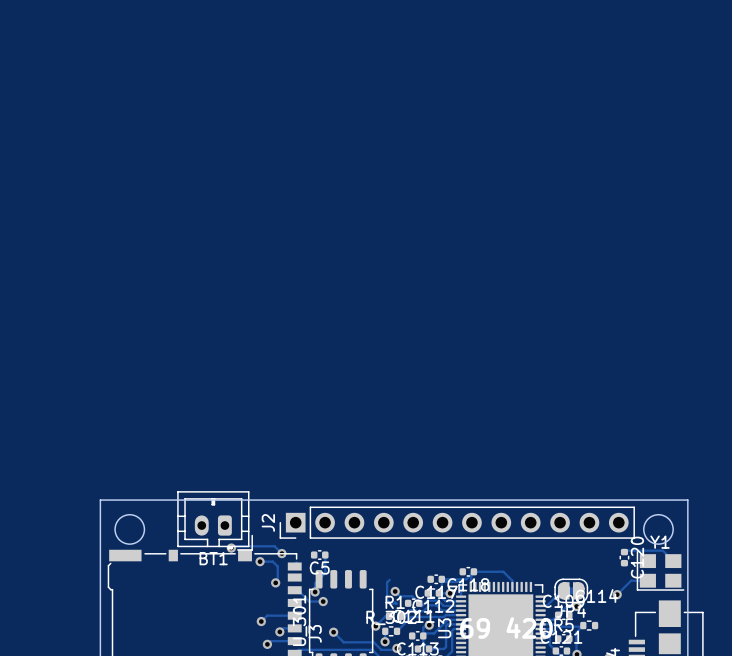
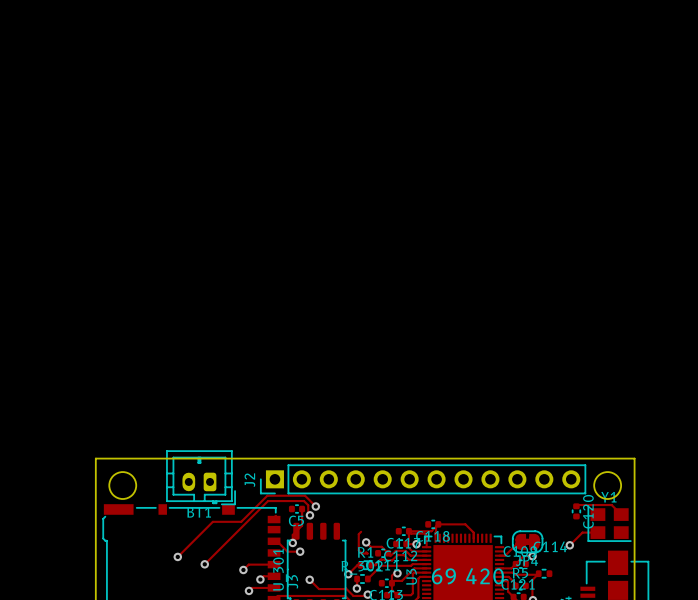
track: (231, 548) (233, 546) (274, 546) (284, 556) -> none
via: (231, 548) -> none
track: none -> (315, 506) (305, 495) (267, 495) (241, 521) (212, 521) (177, 556)
via: none -> (315, 506)
via: (281, 553) -> none
track: (260, 561) (272, 561) (277, 566) (277, 580) (275, 582) -> none
via: (260, 561) -> none
track: none -> (309, 515) (308, 505) (304, 501) (268, 501) (204, 564)
via: none -> (309, 515)
via: (275, 582) -> none
via: none -> (177, 556)
via: none -> (204, 564)

